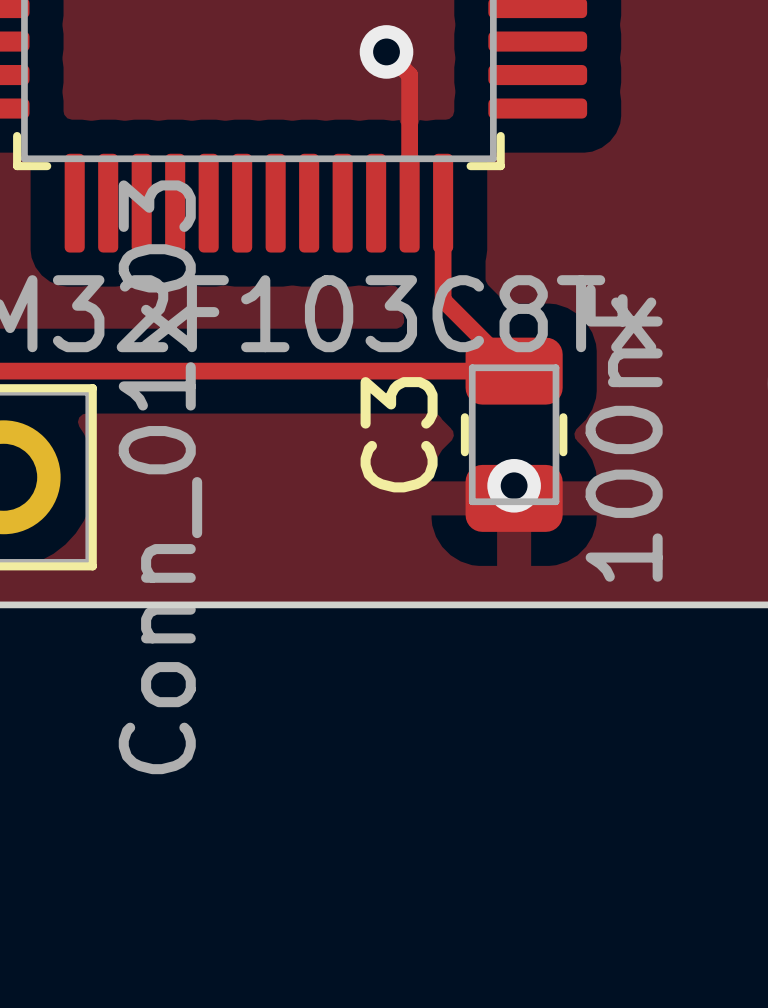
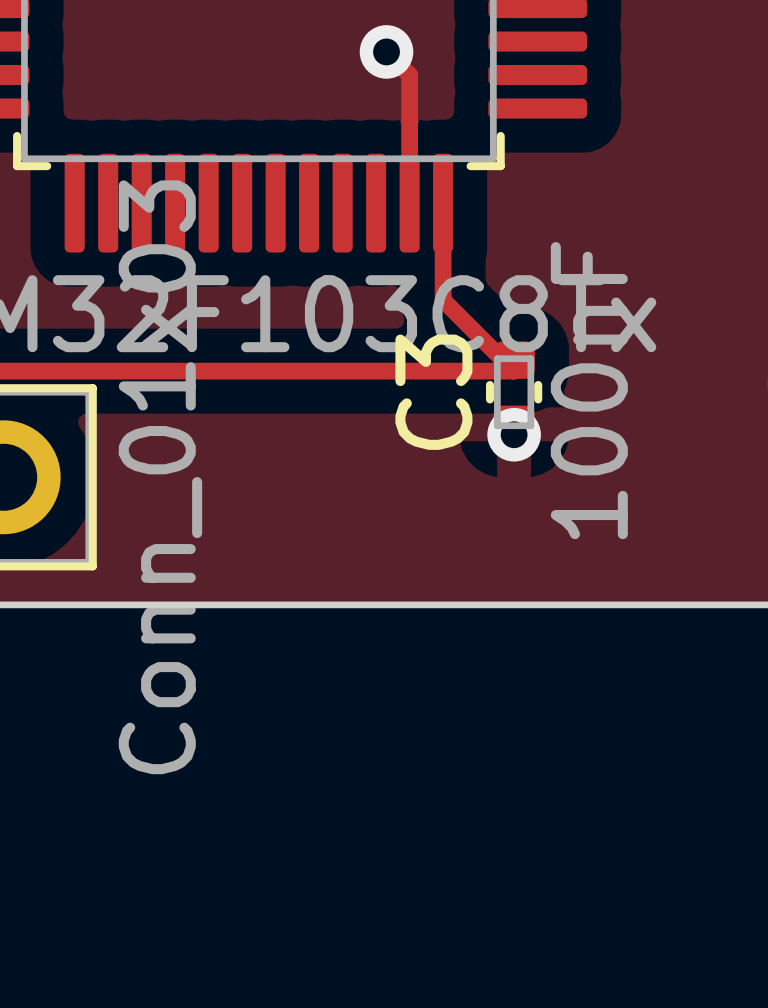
C3 footprint: [460, 337, 568, 532] -> [485, 341, 543, 444]
via position: (514, 485) -> (514, 434)

